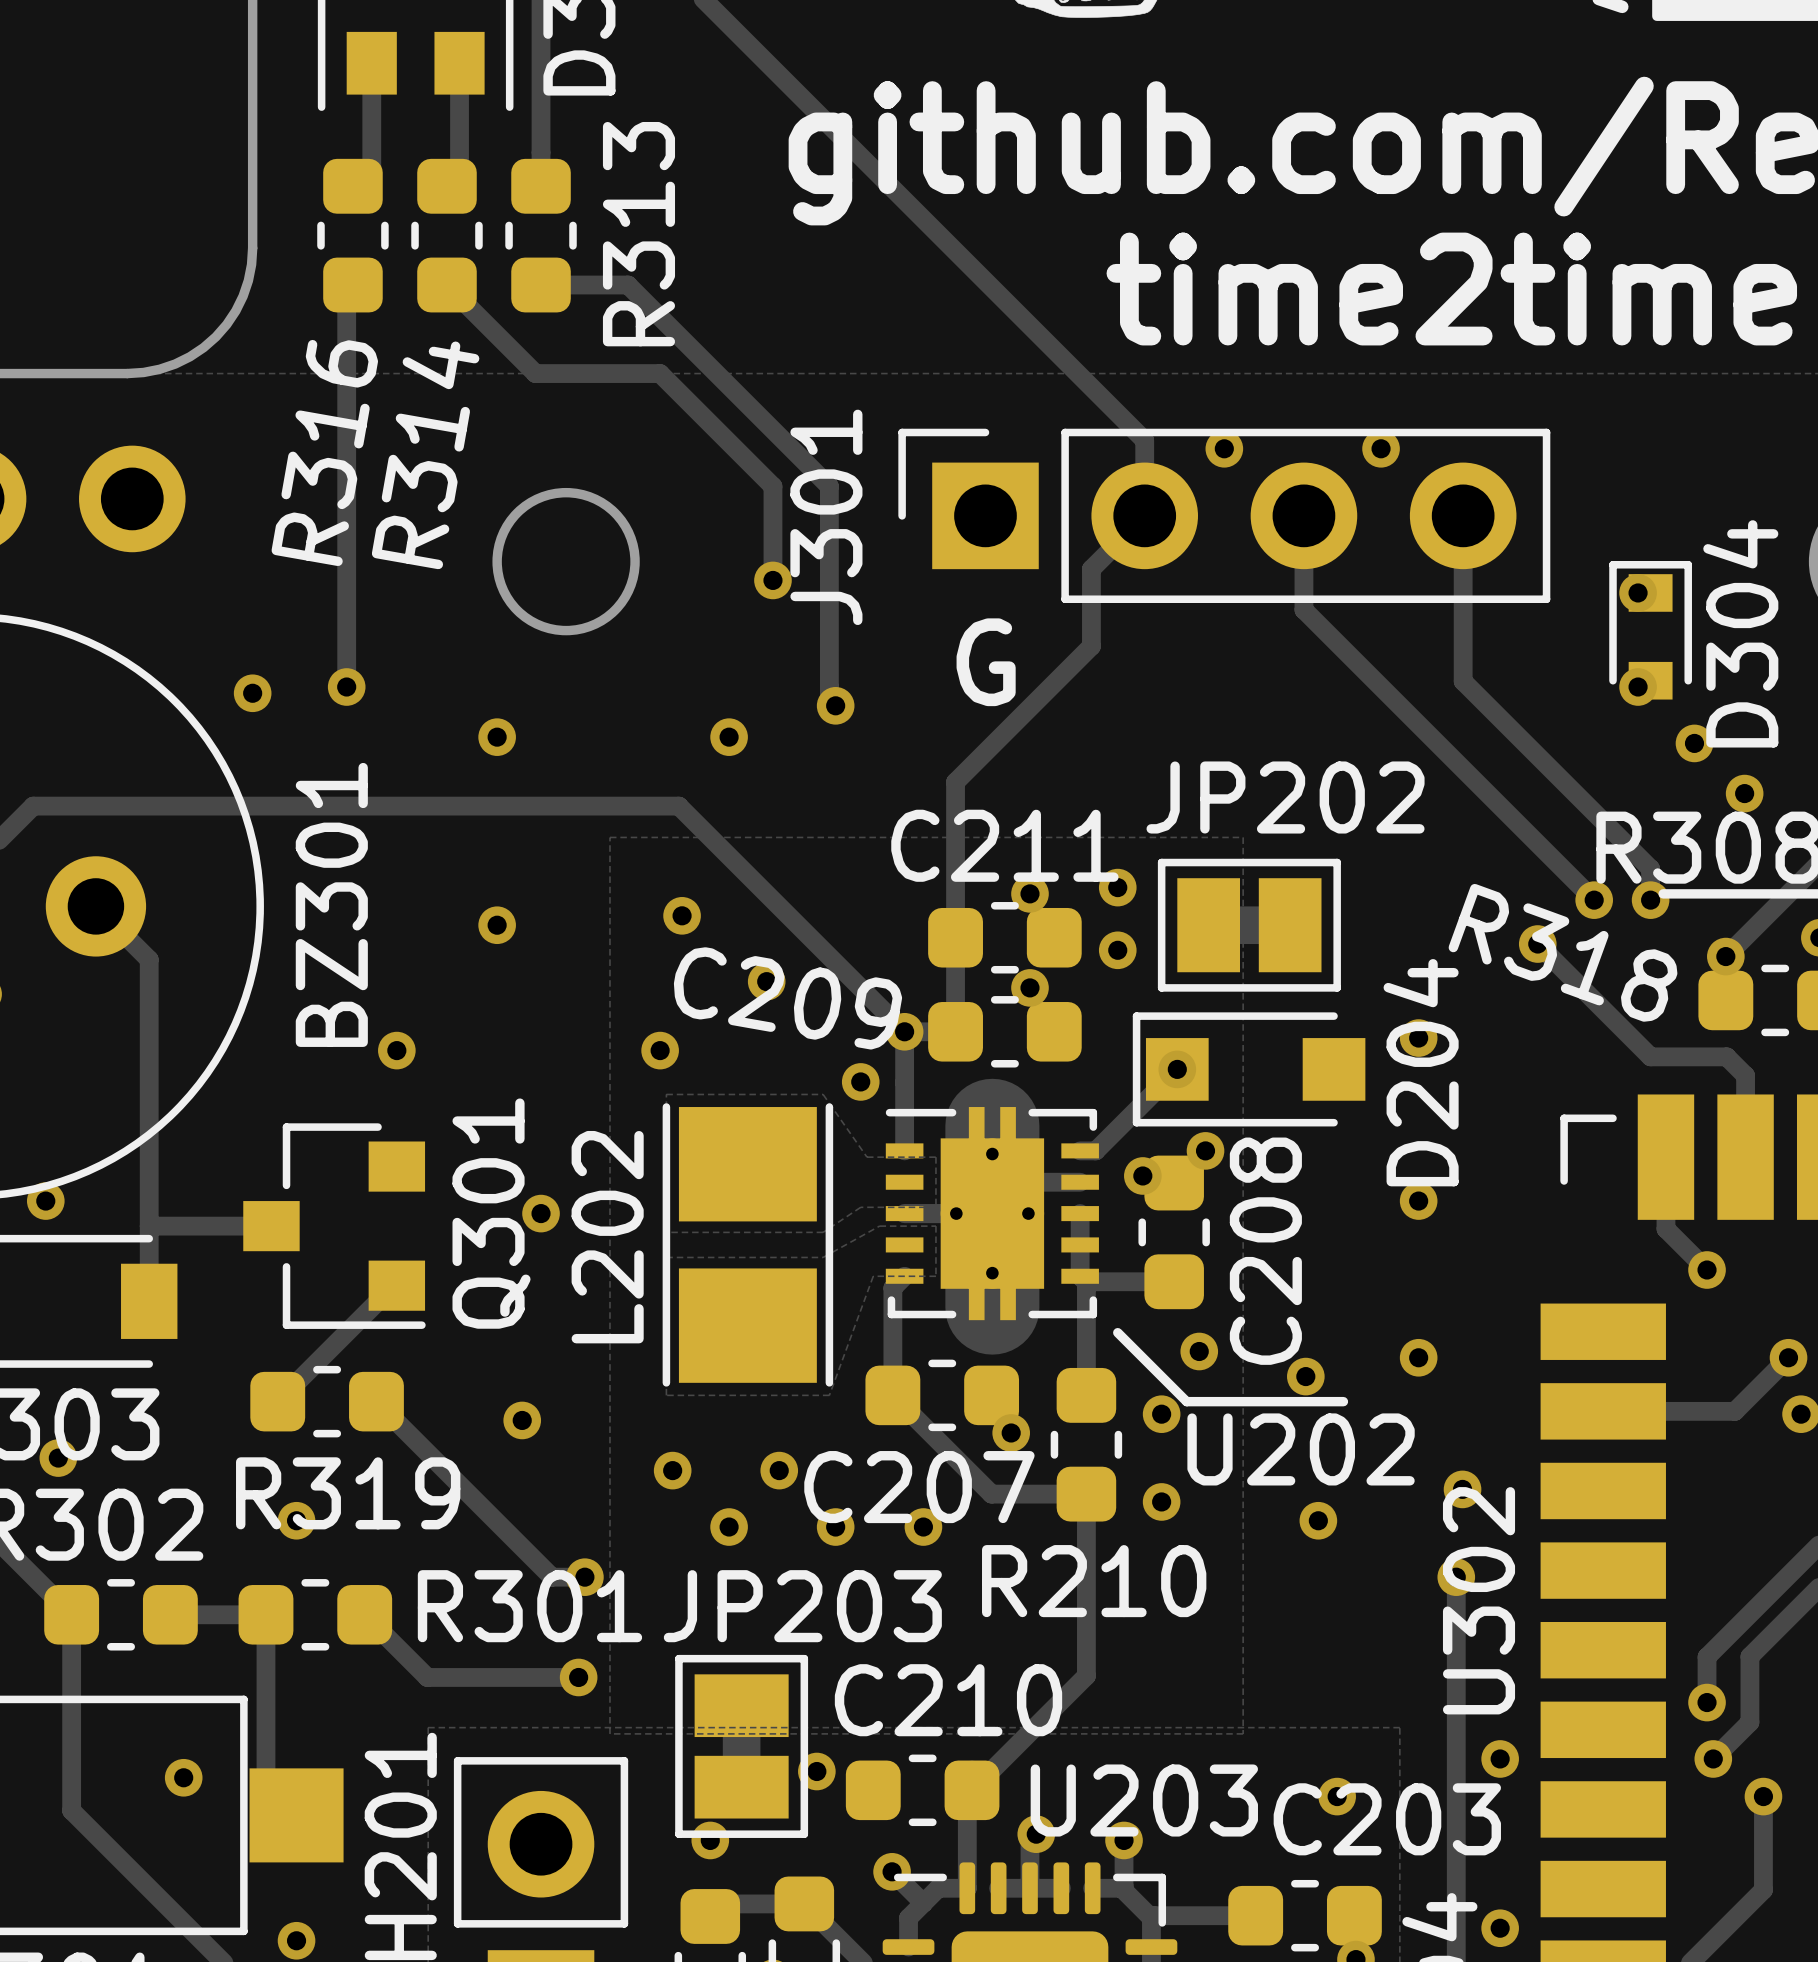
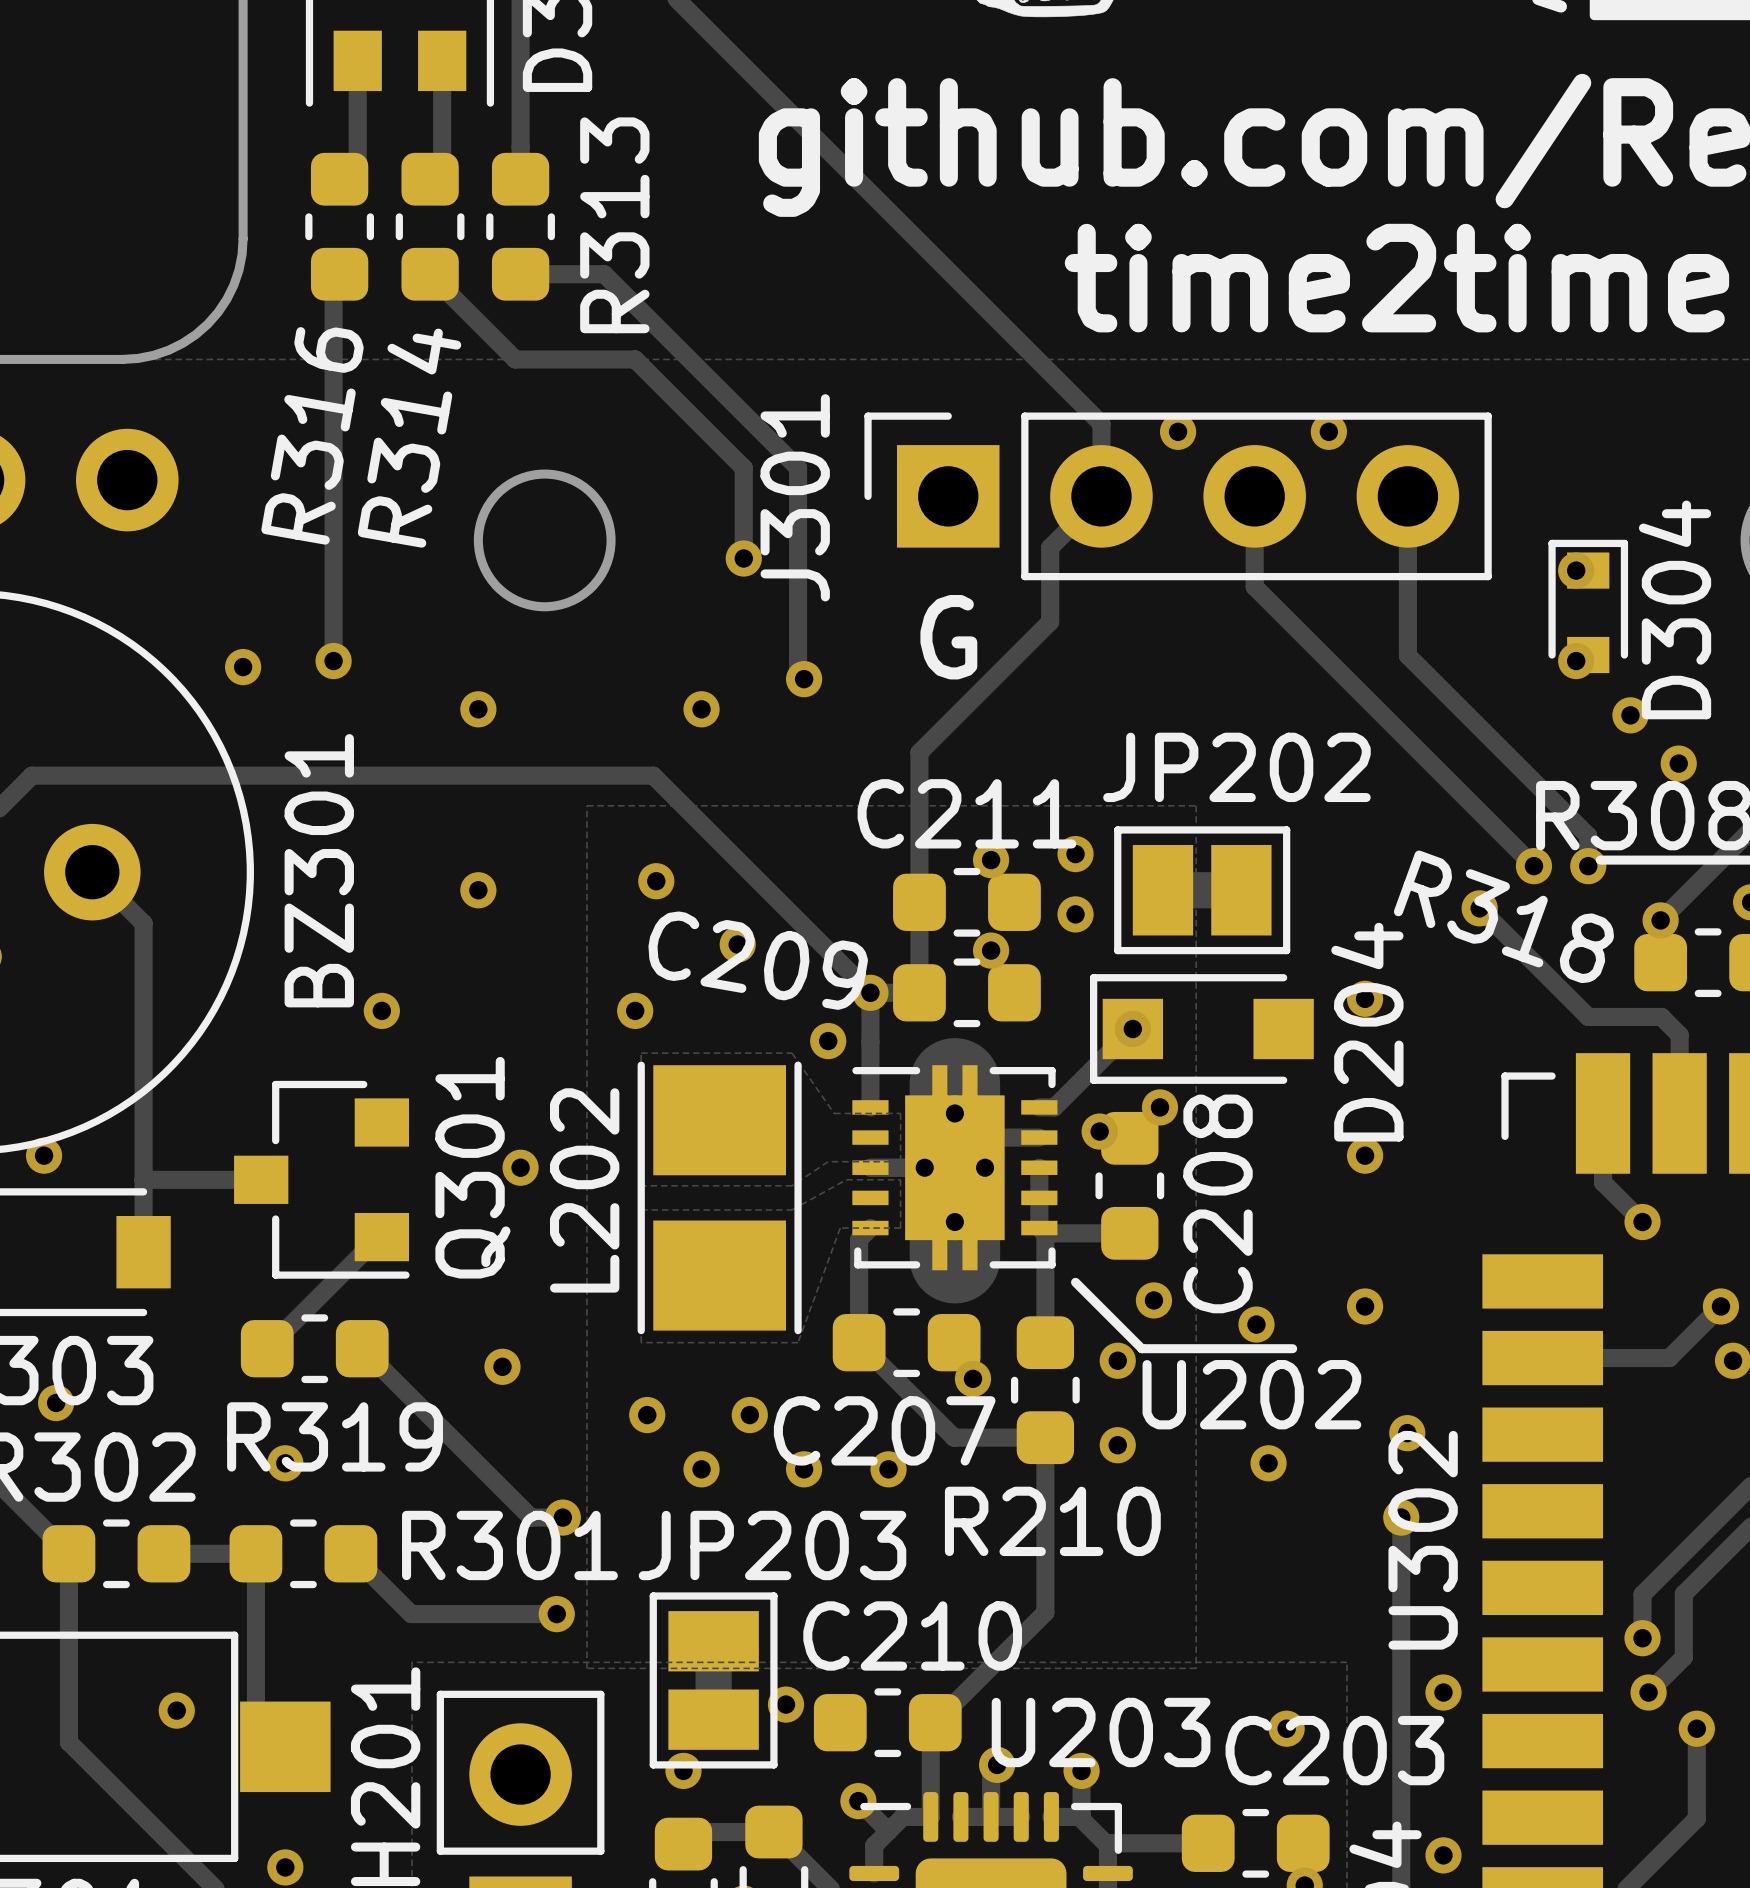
U202 footprint: [885, 1107, 1099, 1321] -> [852, 1065, 1058, 1271]

